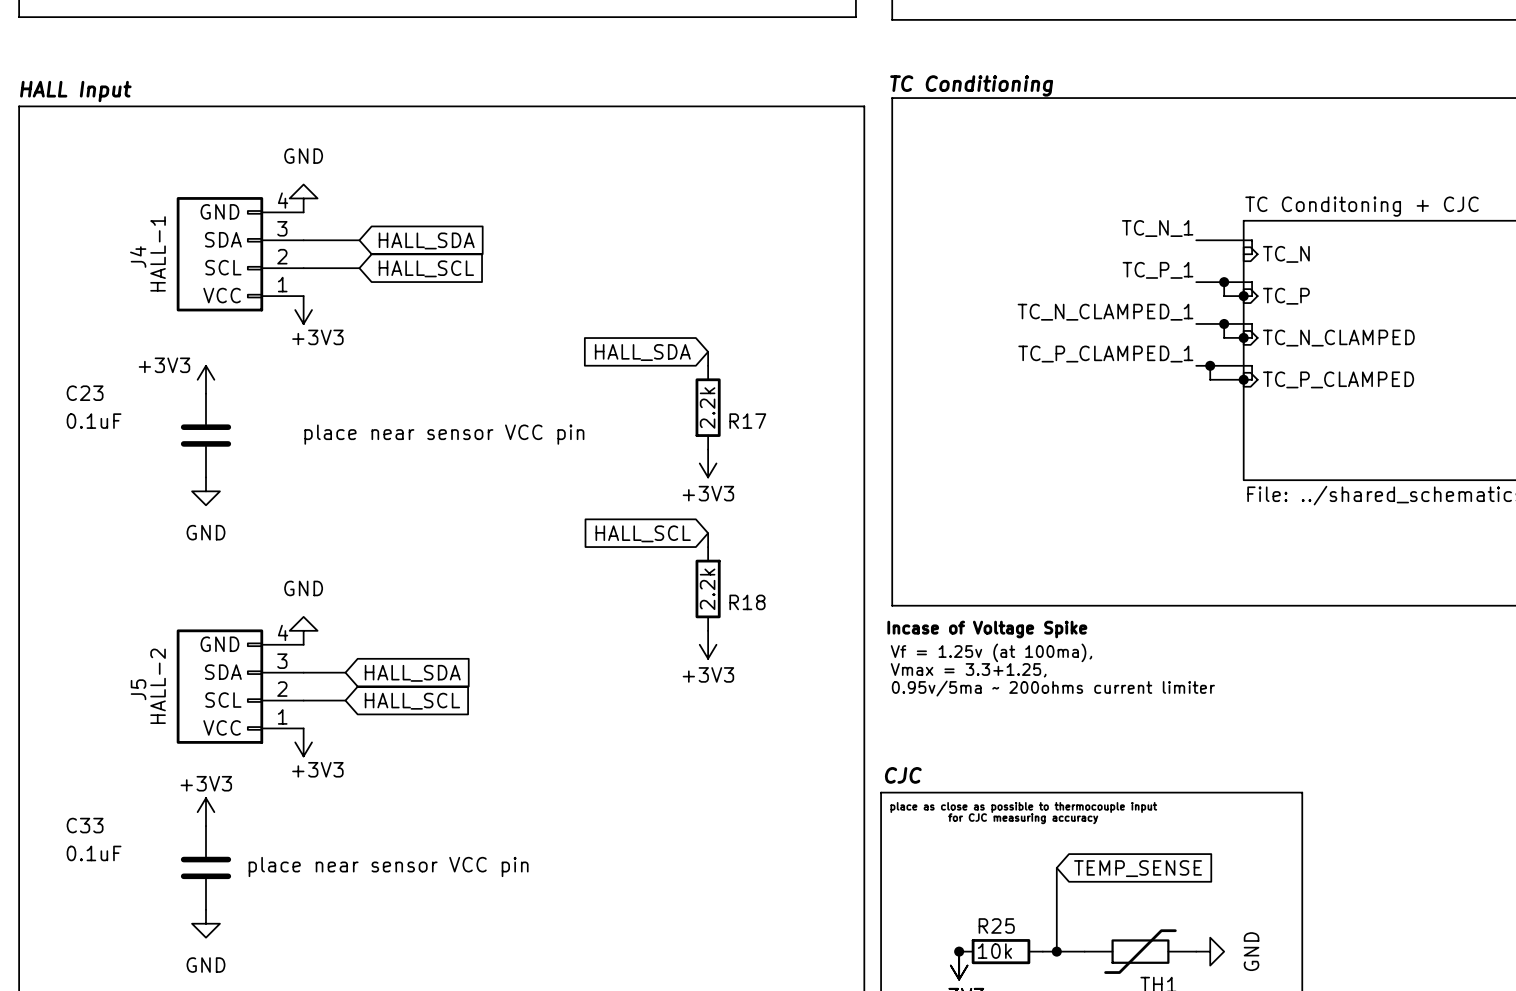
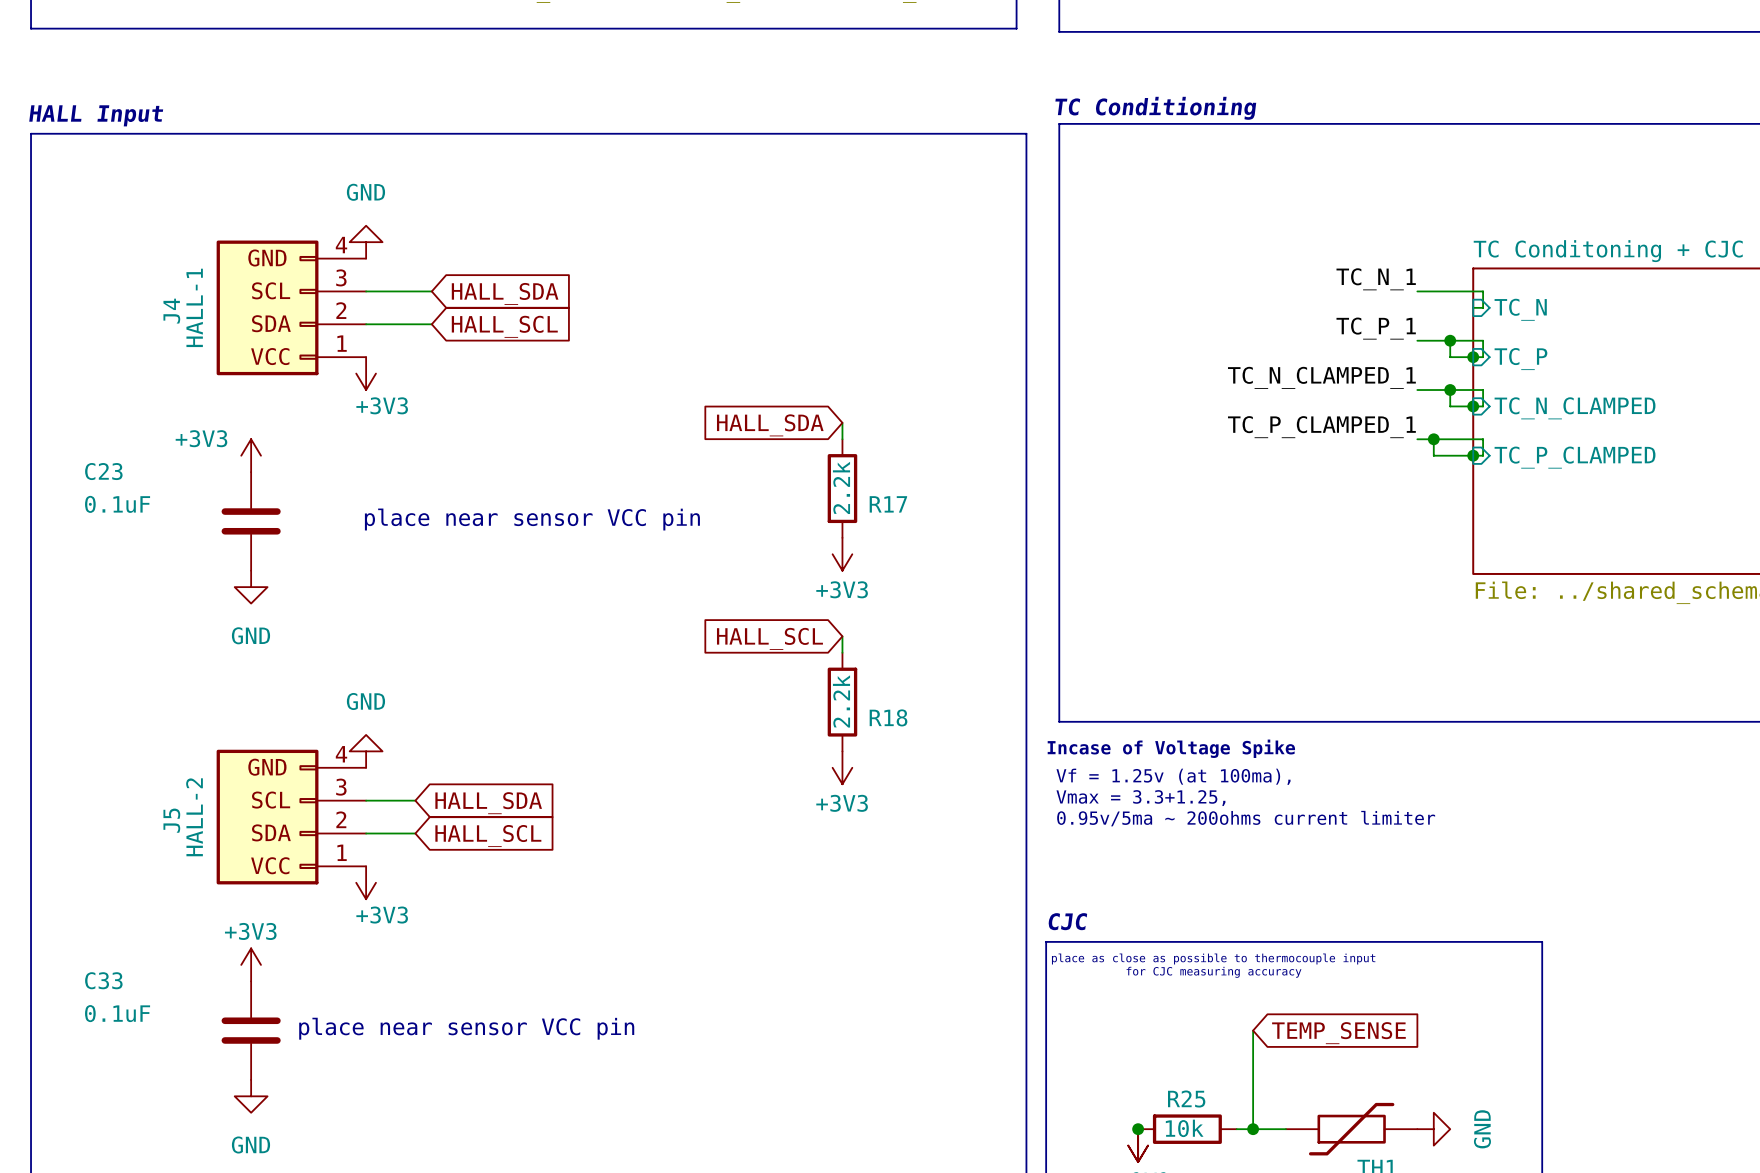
J4 text: SDA (223, 239) -> SCL (271, 290)
J4 text: SCL (223, 267) -> SDA (271, 323)
J5 text: SDA (223, 672) -> SCL (271, 800)
J5 text: SCL (223, 700) -> SDA (271, 832)

